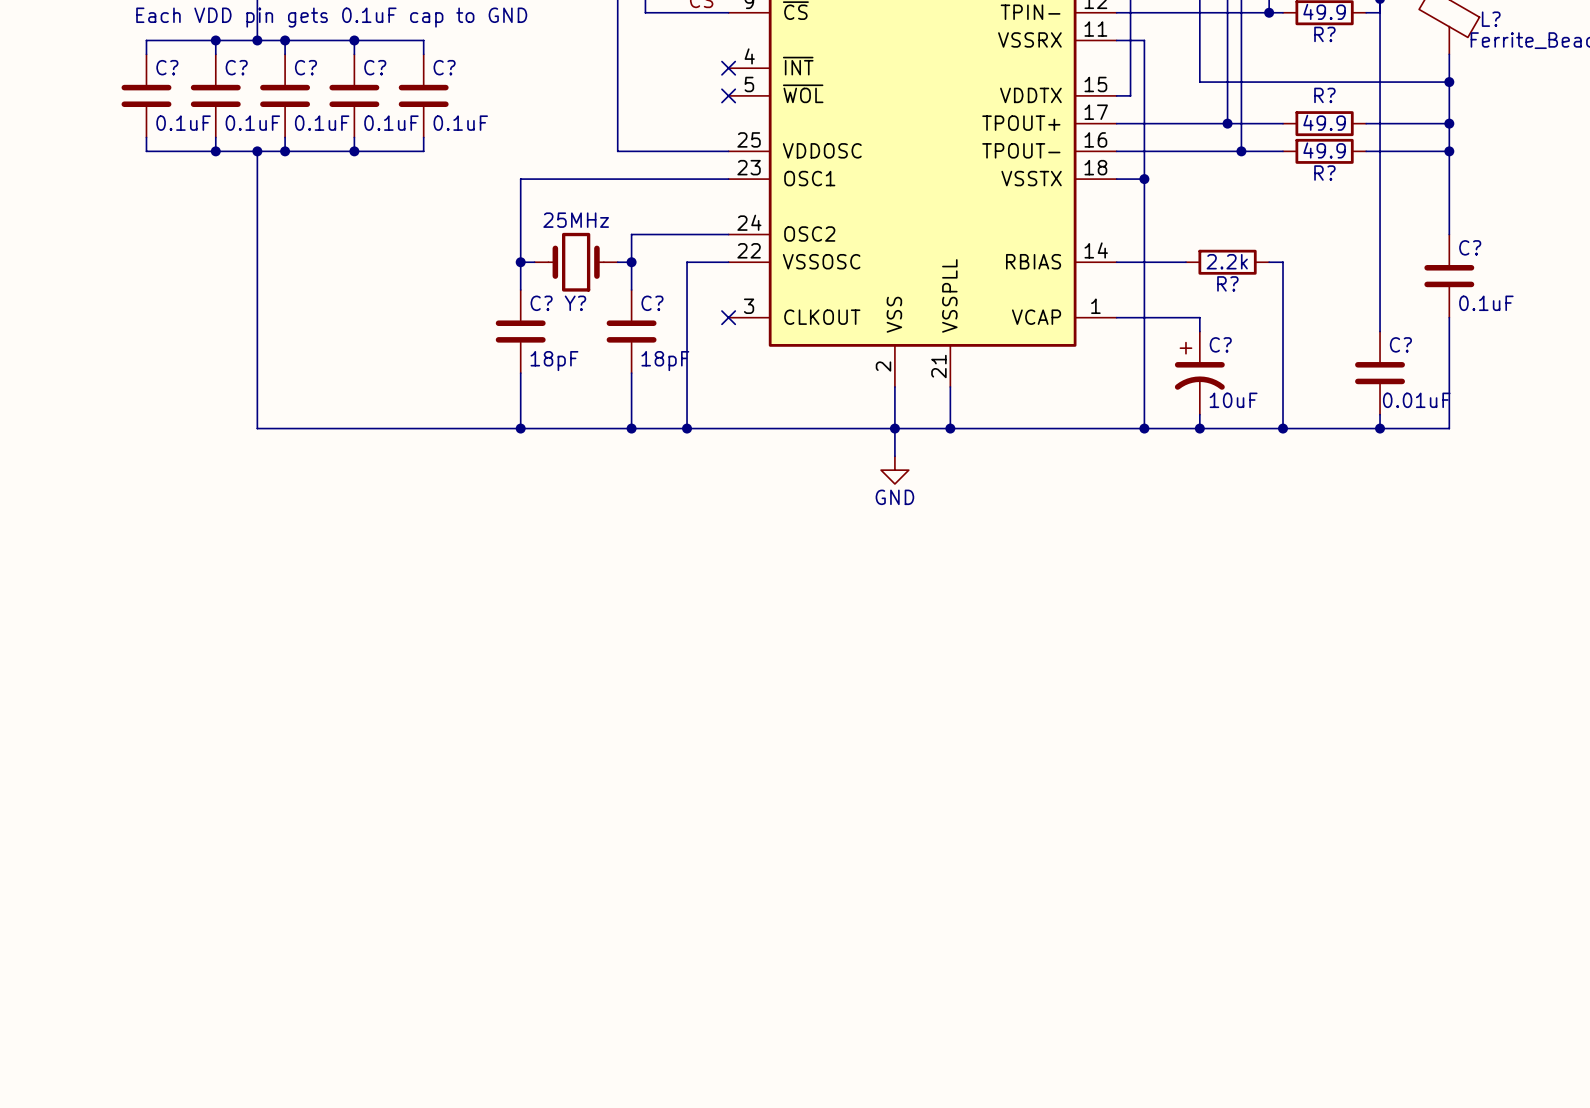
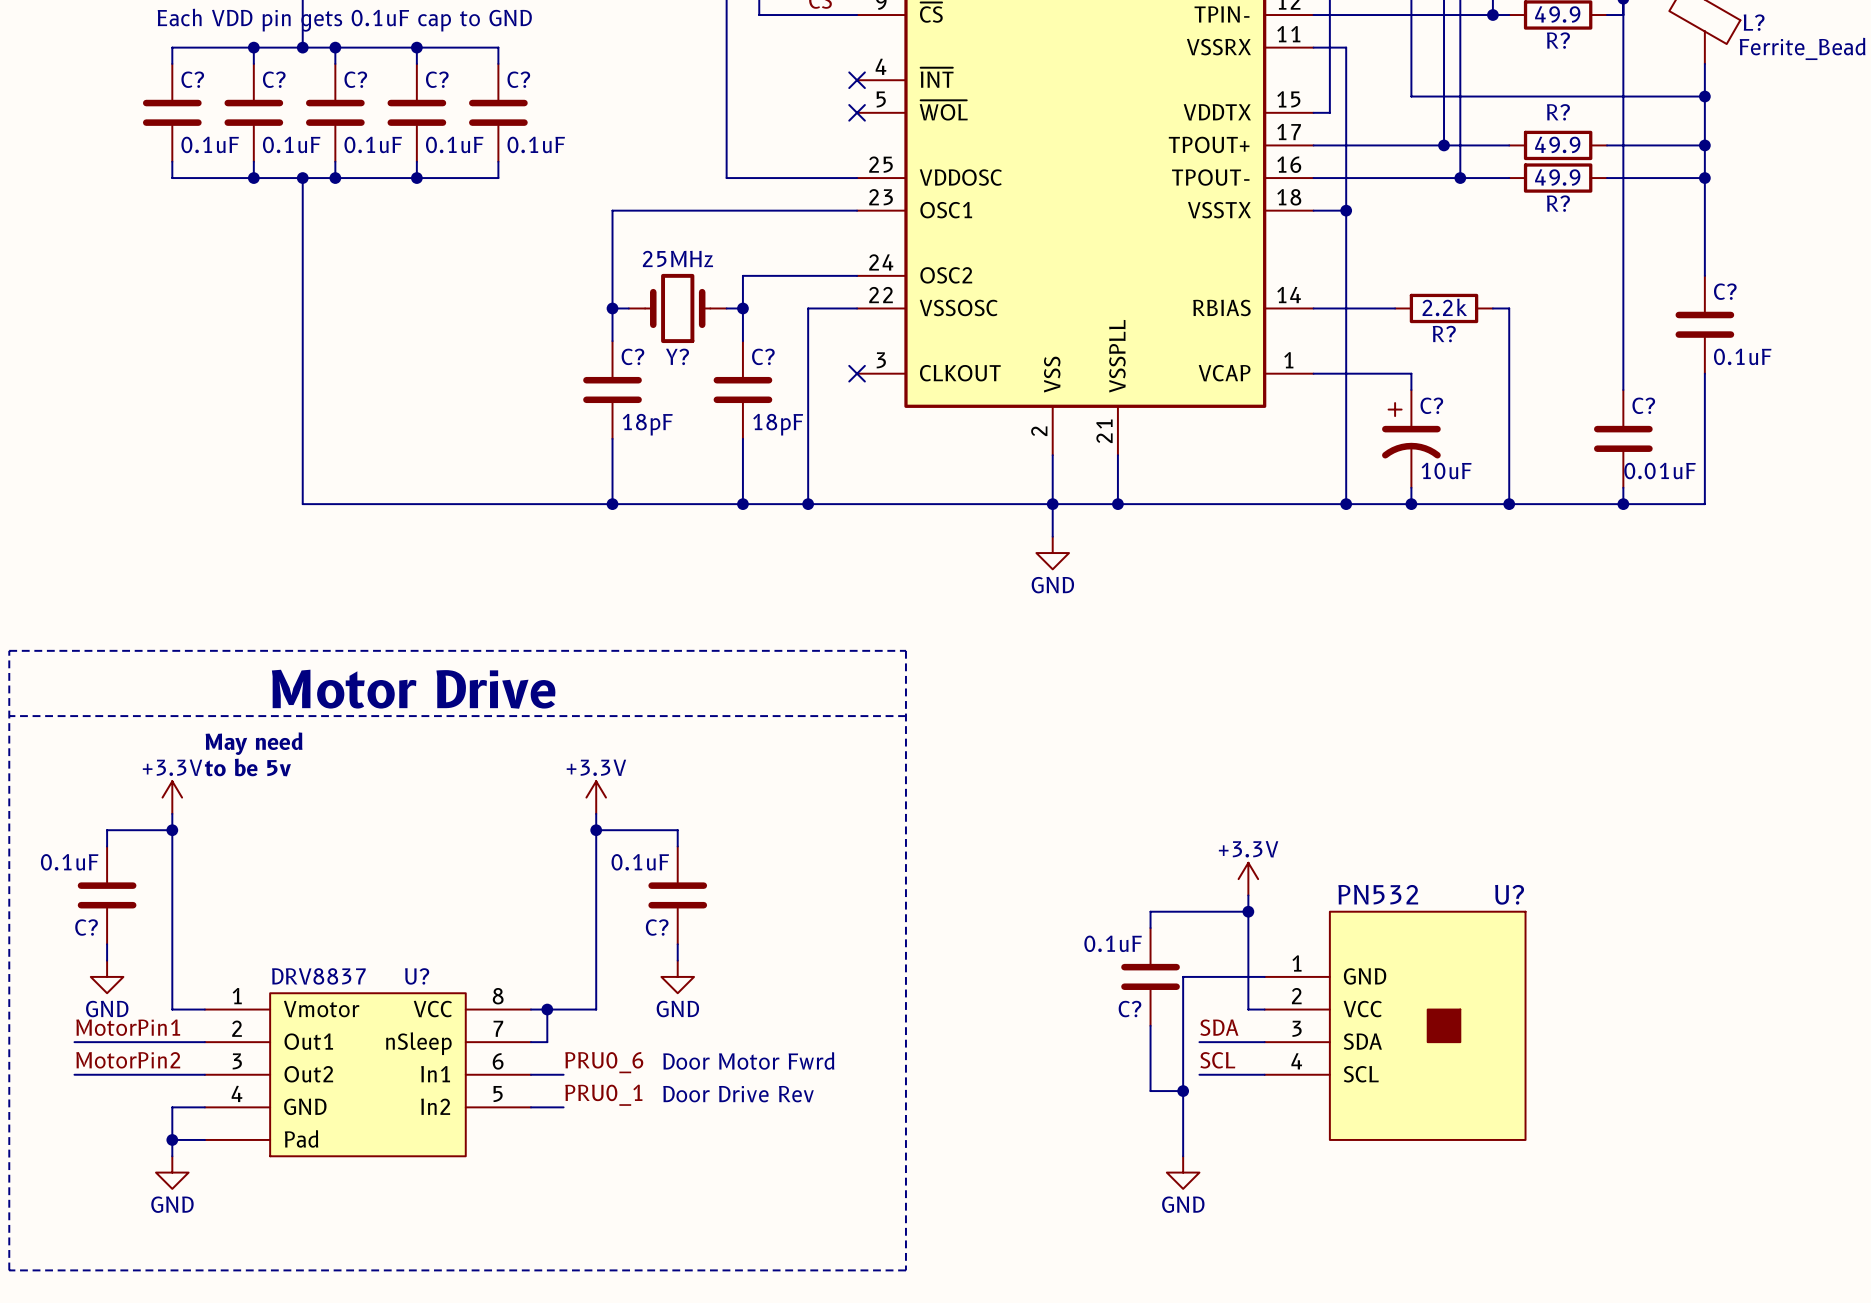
line: none -> (9, 650) (905, 650) (905, 1270) (9, 1270) (9, 650)
text: none -> Motor Drive (413, 689)
line: none -> (9, 716) (905, 716)
text: none -> May need (254, 743)
text: none -> to be 5v (247, 767)
power symbol: none -> +3.3V (172, 797)
power symbol: none -> +3.3V (596, 797)
wire: none -> (172, 813) (172, 1009) (204, 1009)
wire: none -> (596, 813) (596, 1009) (530, 1009)
wire: none -> (172, 830) (107, 830) (107, 846)
junction: none -> (172, 830)
wire: none -> (596, 830) (677, 830) (677, 846)
junction: none -> (596, 830)
power symbol: none -> +3.3V (1248, 879)
C?: none -> 0.1uF (107, 895)
C?: none -> 0.1uF (677, 895)
wire: none -> (1248, 895) (1248, 1009) (1264, 1009)
wire: none -> (1248, 911) (1150, 911) (1150, 928)
junction: none -> (1248, 911)
wire: none -> (107, 944) (107, 960)
wire: none -> (677, 944) (677, 960)
power symbol: none -> GND (107, 976)
power symbol: none -> GND (677, 976)
C?: none -> 0.1uF (1150, 976)
wire: none -> (1264, 976) (1183, 976) (1183, 1156)
wire: none -> (547, 1009) (547, 1042) (530, 1042)
junction: none -> (547, 1009)
wire: none -> (1150, 1025) (1150, 1091) (1183, 1091)
U?: none -> PN532 (1395, 1025)
label: none -> MotorPin1 (128, 1027)
label: none -> SDA (1219, 1027)
wire: none -> (74, 1042) (204, 1042)
wire: none -> (1199, 1042) (1264, 1042)
label: none -> MotorPin2 (128, 1060)
label: none -> PRU0_6 (604, 1062)
label: none -> SCL (1217, 1060)
text: none -> Door Motor Fwrd (748, 1060)
wire: none -> (74, 1074) (204, 1074)
U?: none -> DRV8837 (367, 1074)
wire: none -> (530, 1074) (563, 1074)
wire: none -> (1199, 1074) (1264, 1074)
junction: none -> (1183, 1091)
label: none -> PRU0_1 (603, 1095)
text: none -> Door Drive Rev (738, 1094)
wire: none -> (204, 1107) (172, 1107) (172, 1156)
wire: none -> (530, 1107) (563, 1107)
wire: none -> (172, 1139) (204, 1139)
junction: none -> (172, 1139)
power symbol: none -> GND (172, 1172)
power symbol: none -> GND (1183, 1172)

